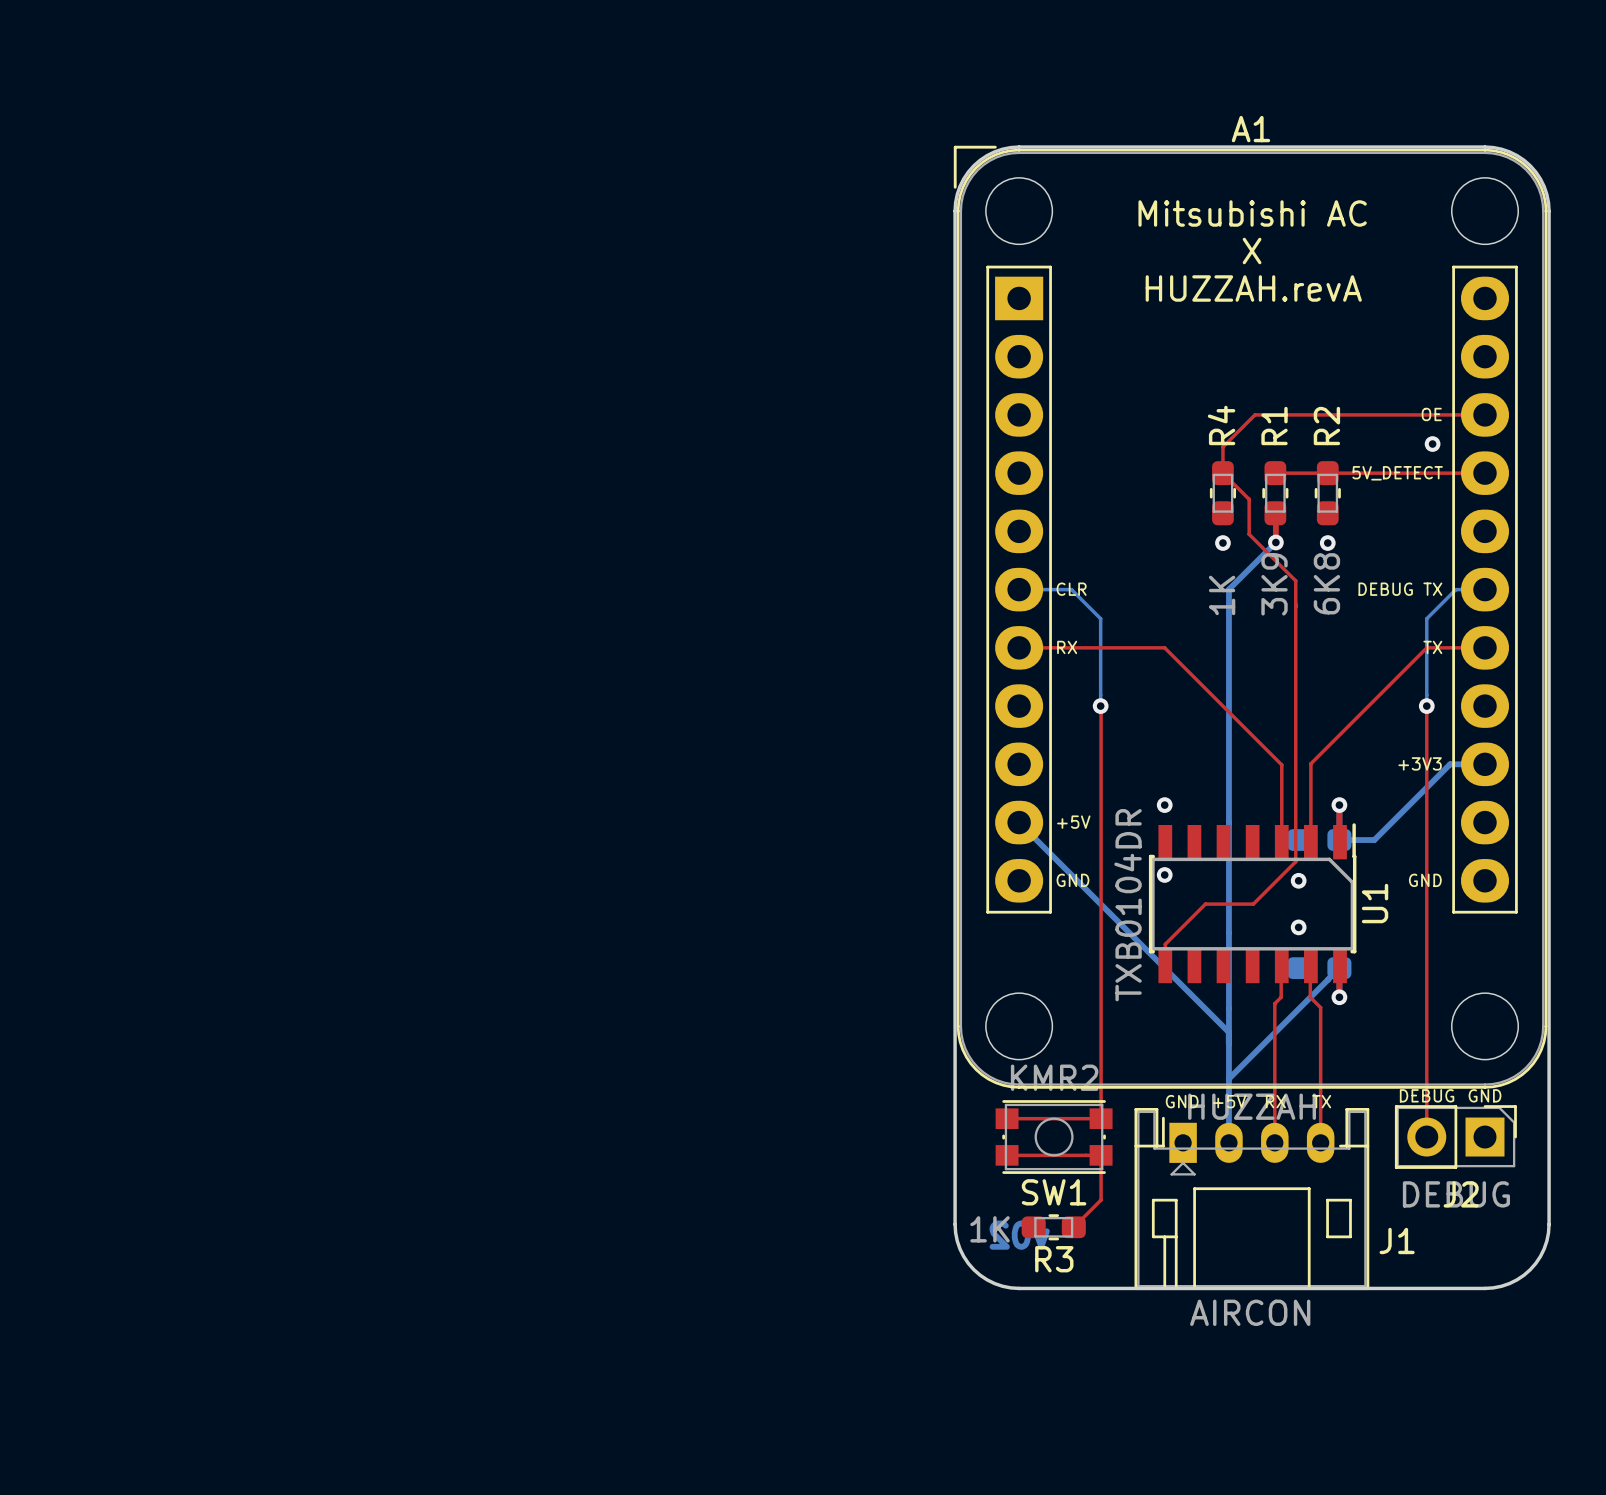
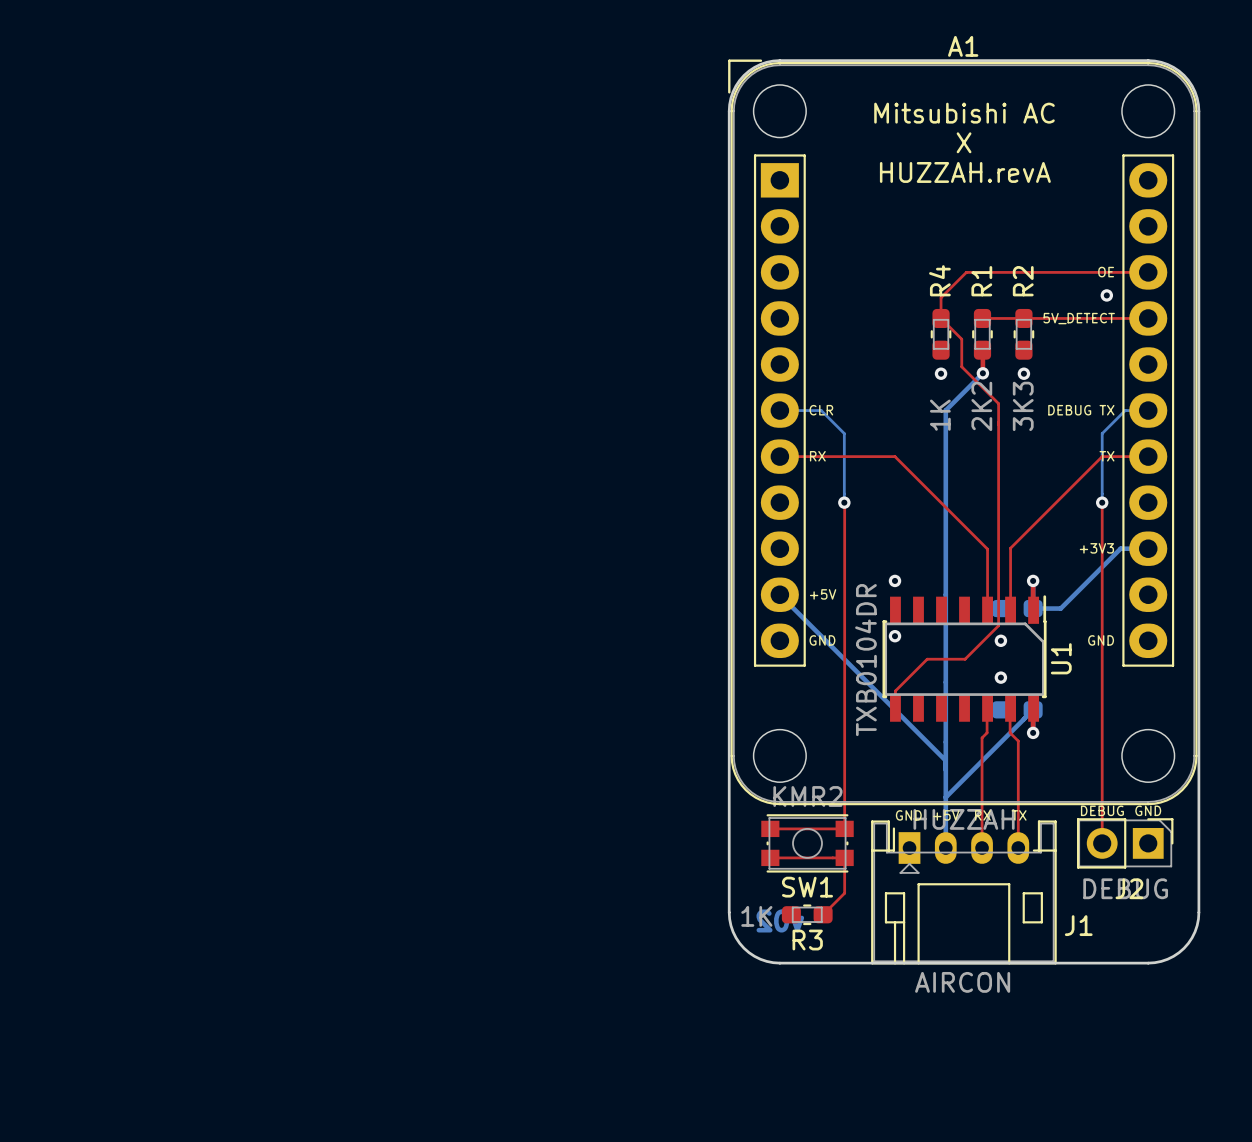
R2 value: 6K8 (1326, 583) -> 3K3 (1023, 406)
R1 value: 3K9 (1274, 584) -> 2K2 (981, 406)

